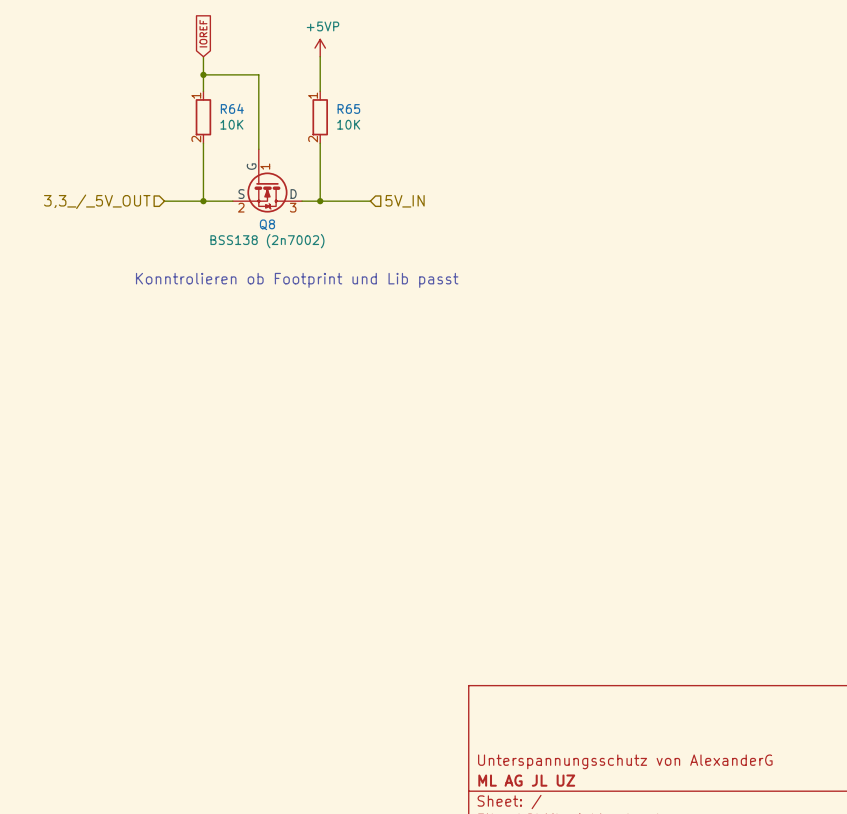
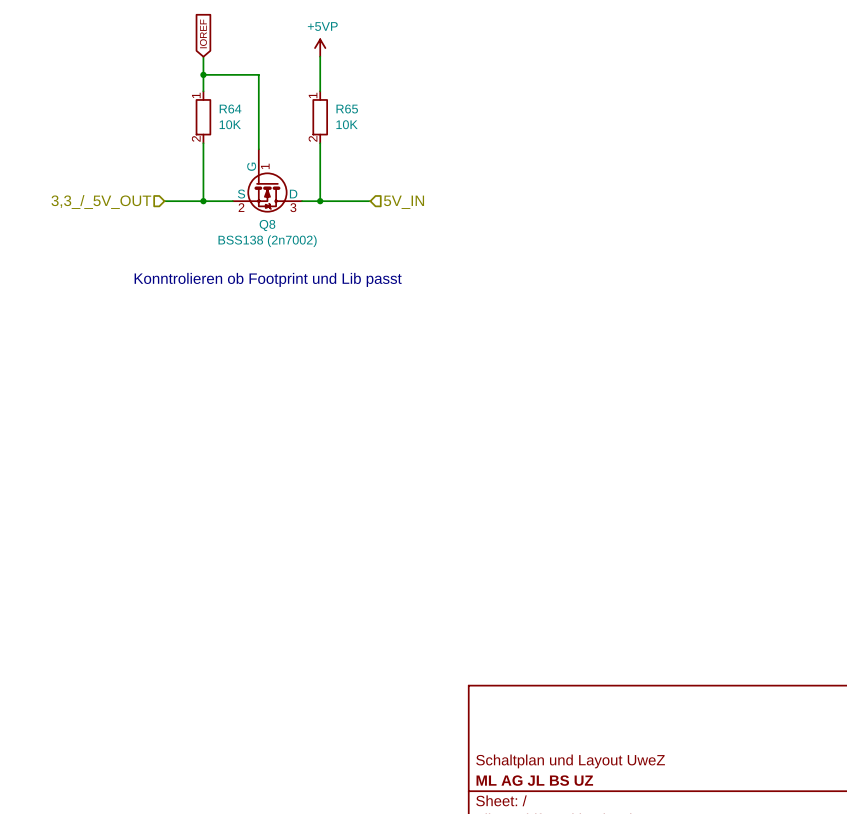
title block: Unterspannungsschutz von AlexanderG (625, 761) -> Schaltplan und Layout UweZ (570, 761)
title block: ML AG JL UZ (526, 780) -> ML AG JL BS UZ (534, 780)

